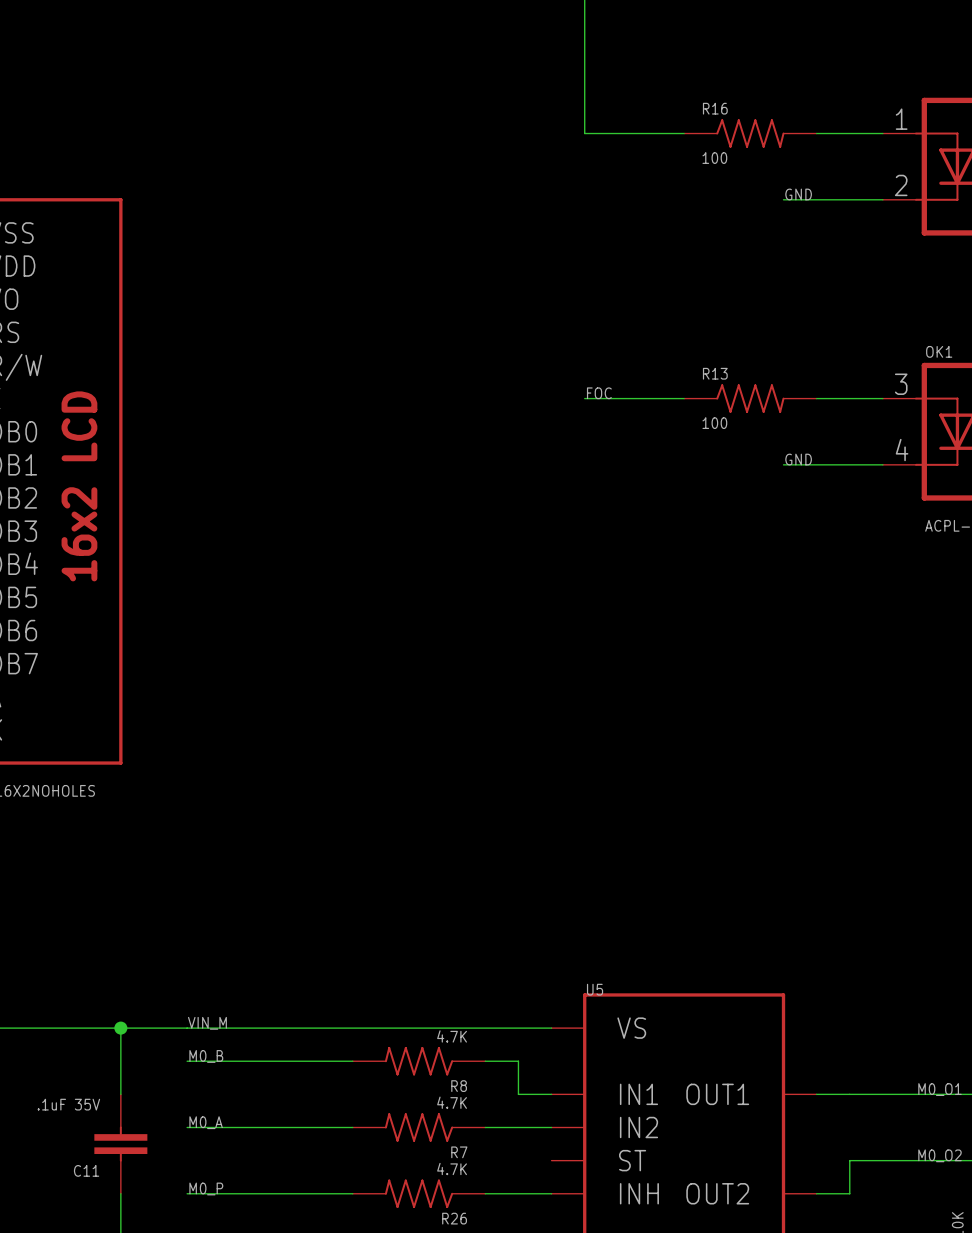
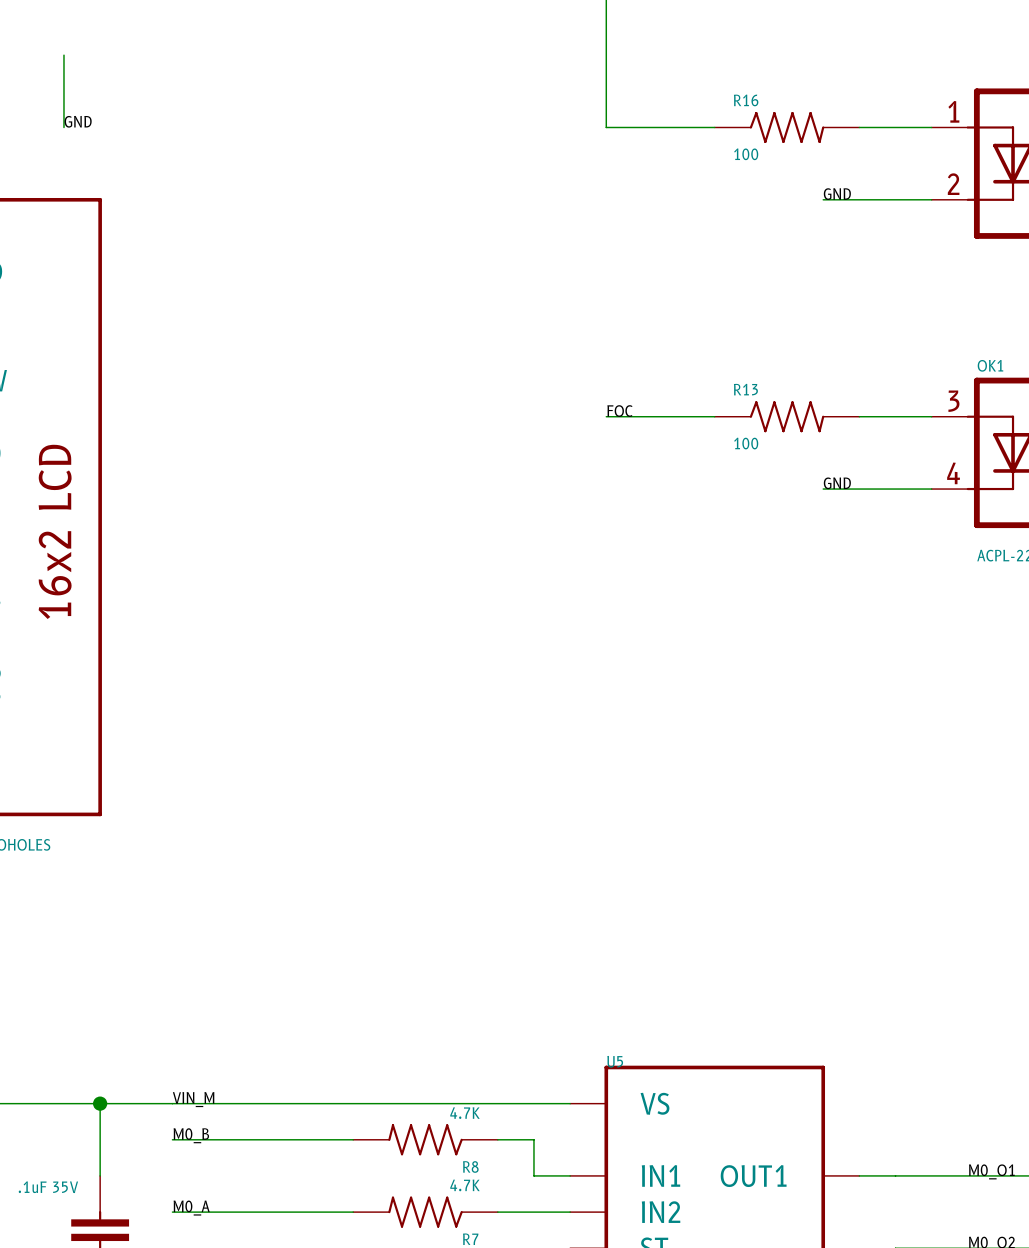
wire: none -> (63, 55) (63, 127)
label: none -> GND (78, 121)

